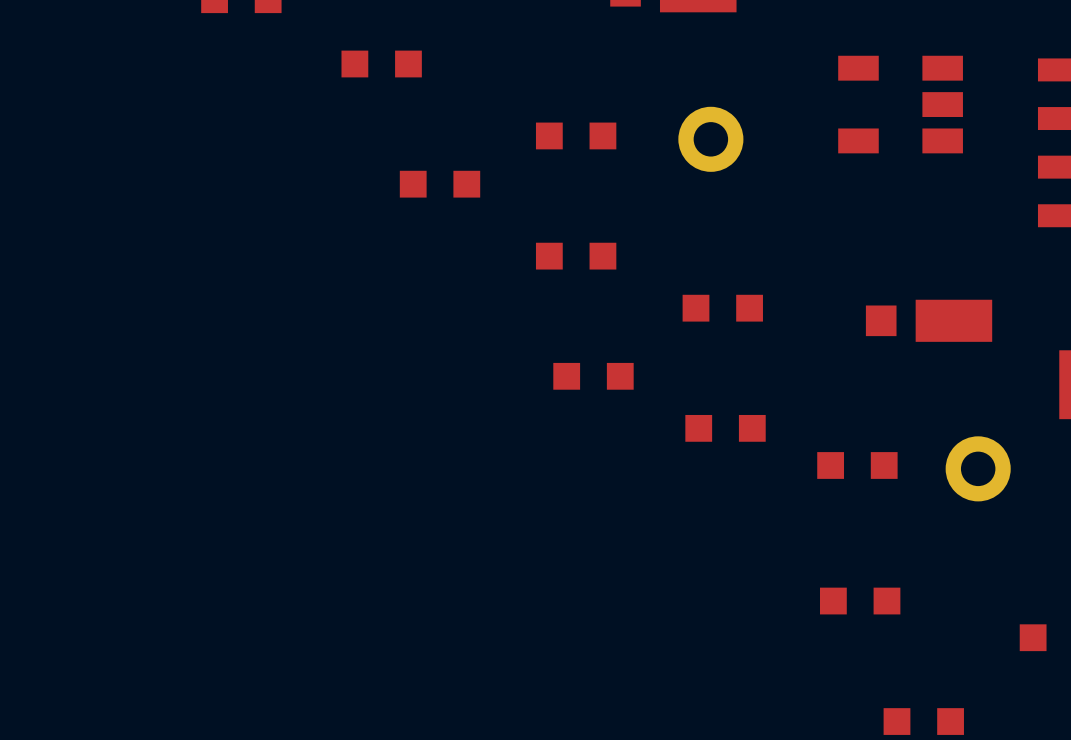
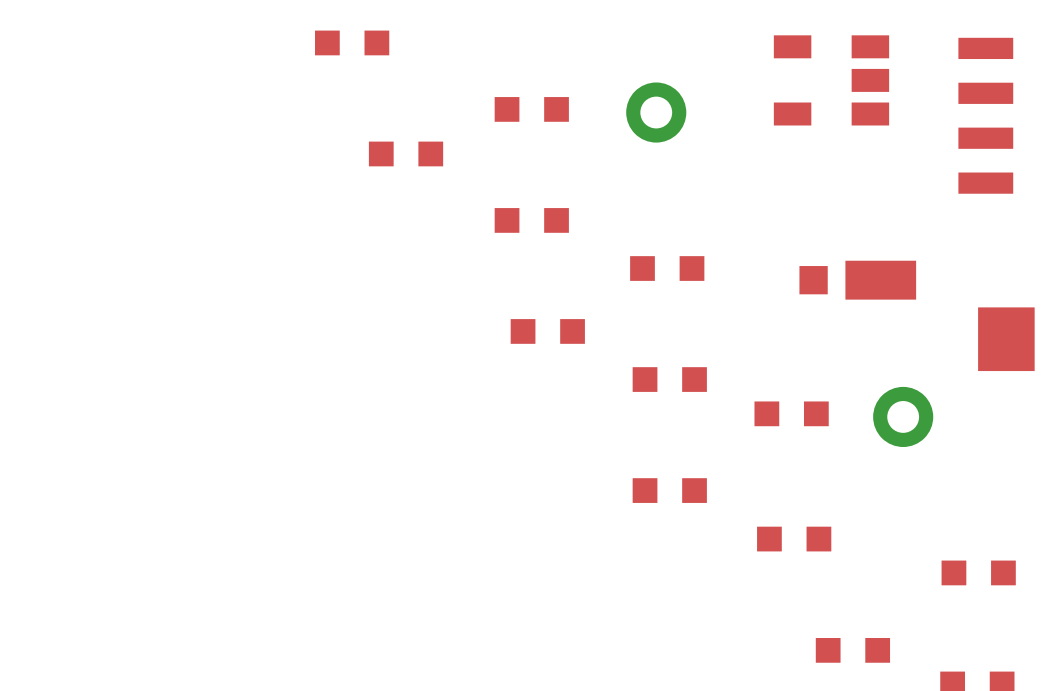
part: none -> (669, 490)

